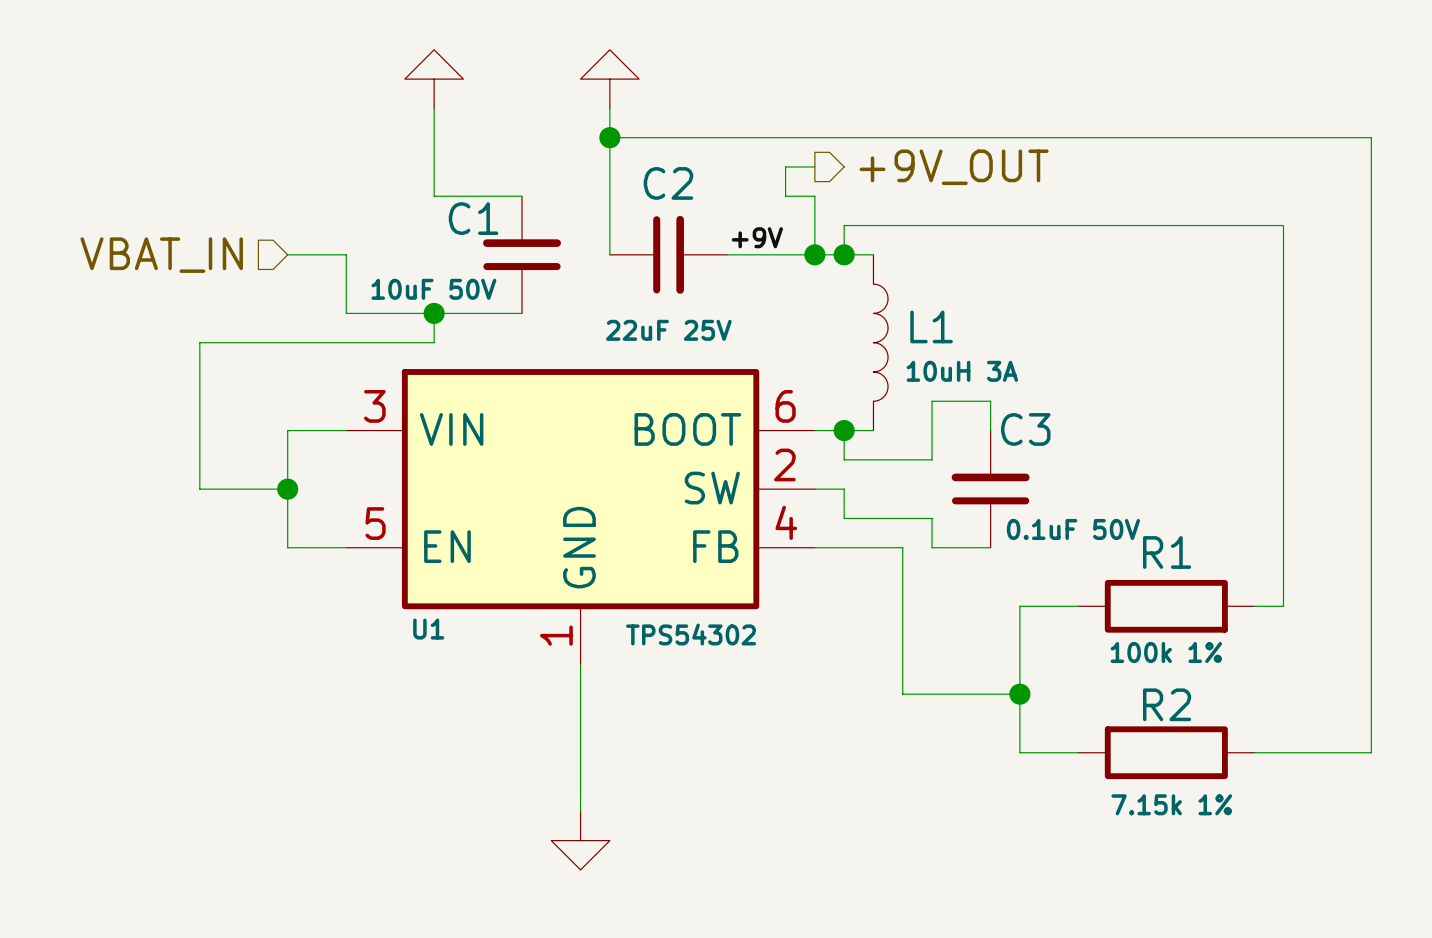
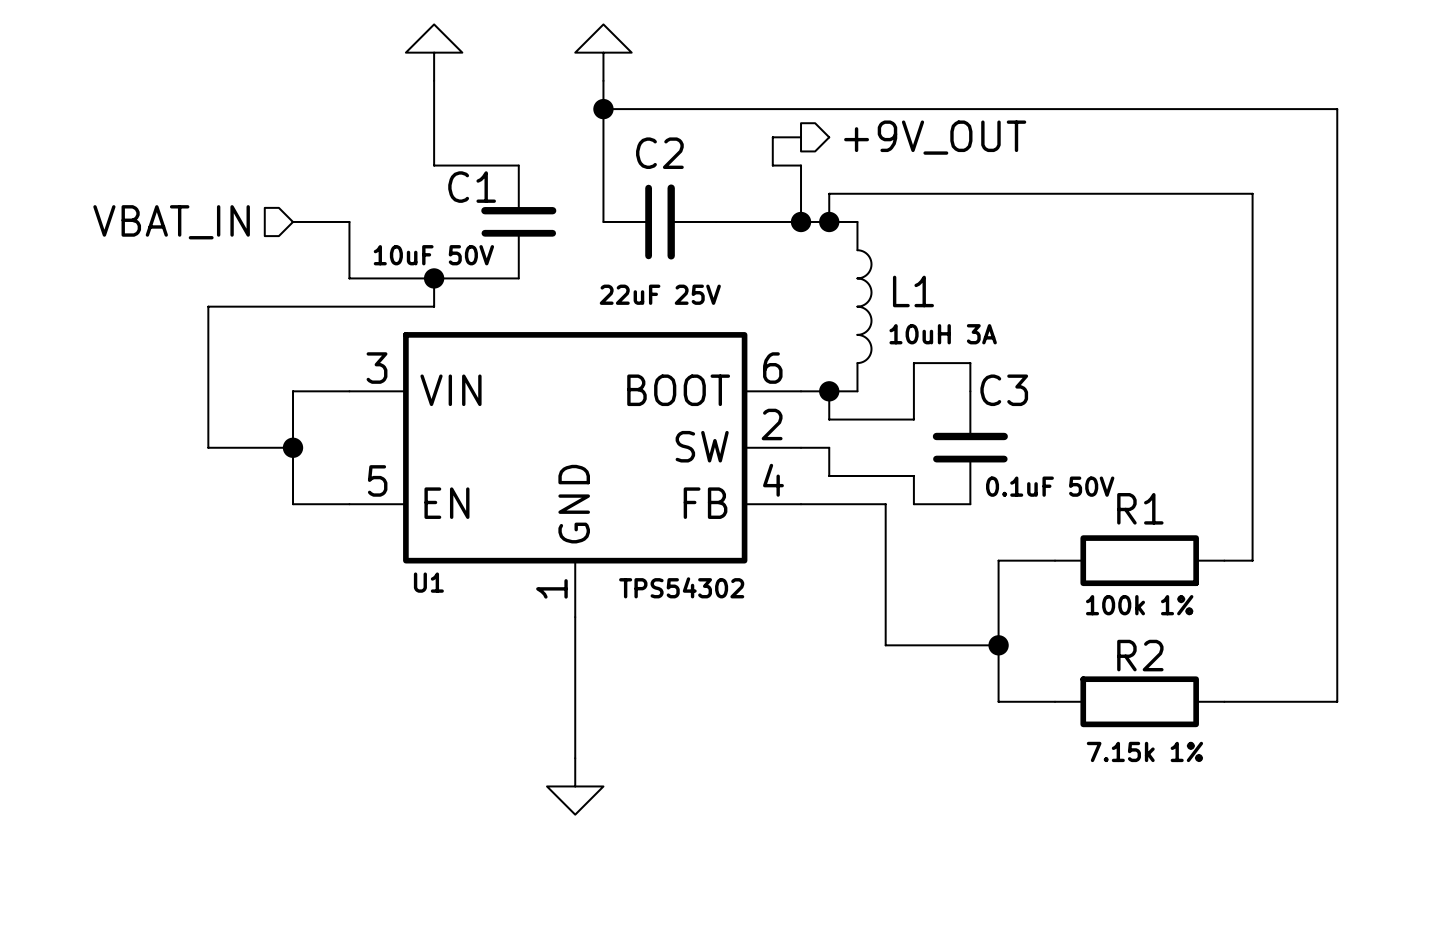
label: +9V (757, 237) -> none

